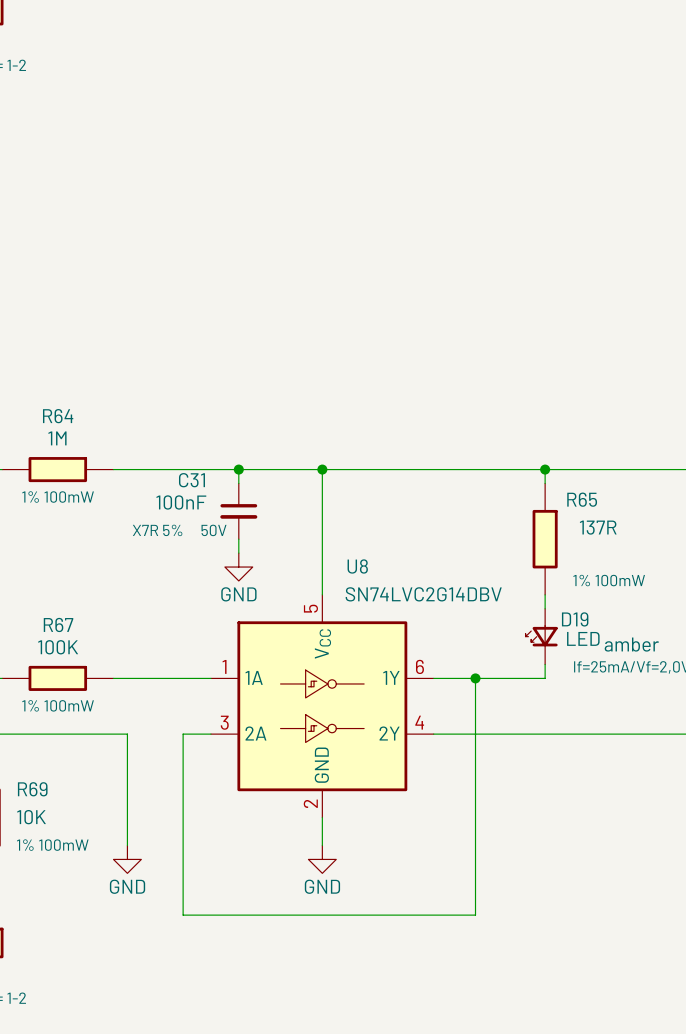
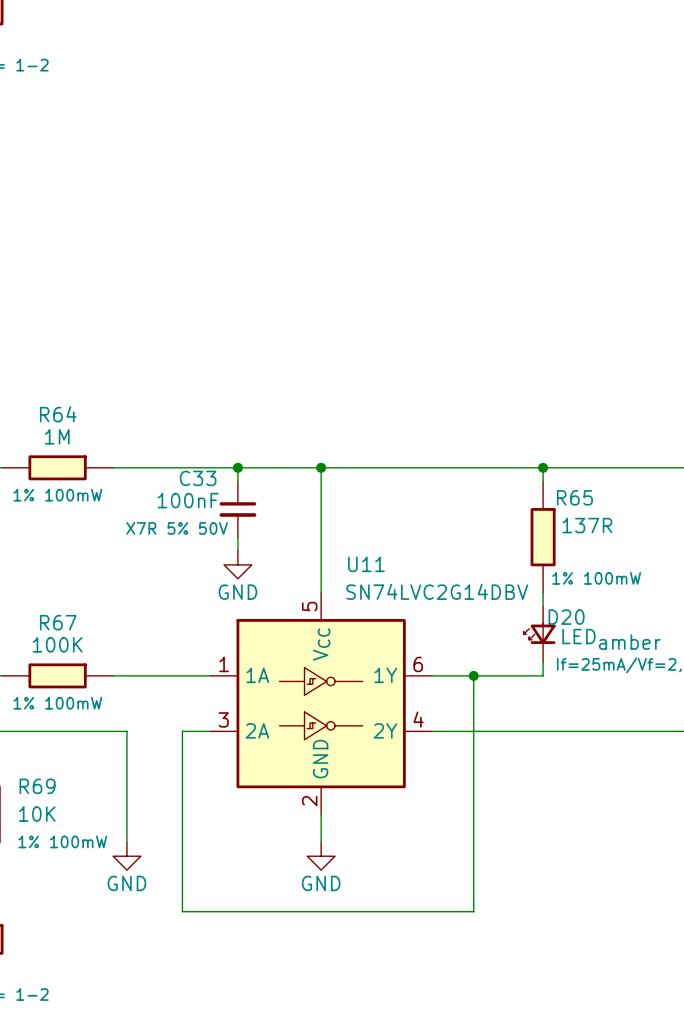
C31 name: C31 (191, 480) -> C33 (198, 478)
U8 name: U8 (357, 566) -> U11 (366, 564)
D19 name: D19 (575, 619) -> D20 (566, 617)

